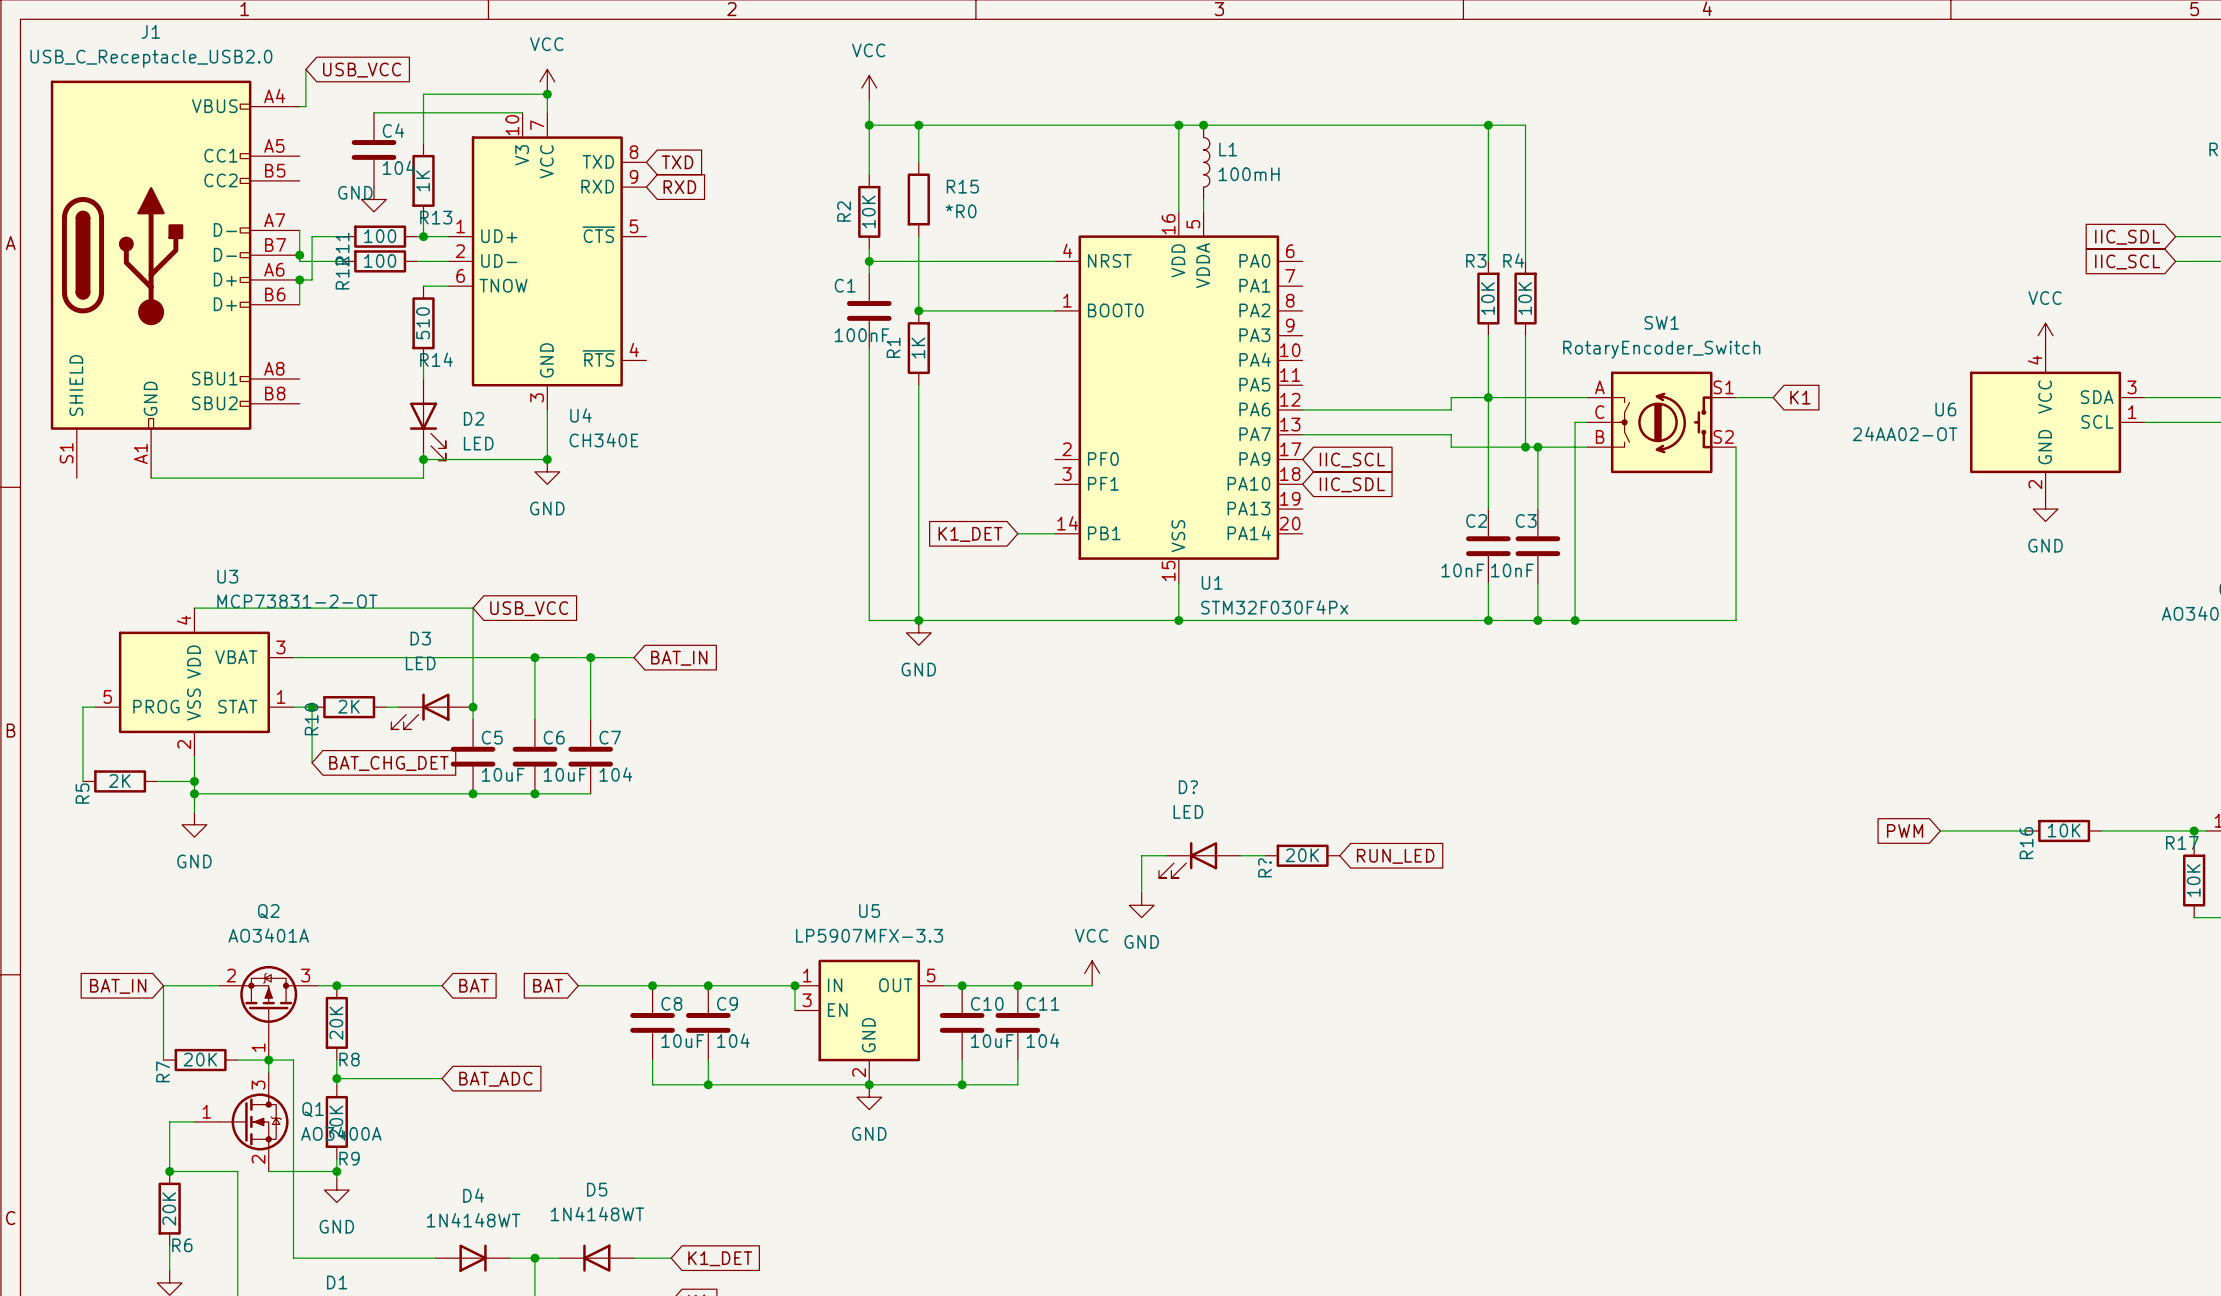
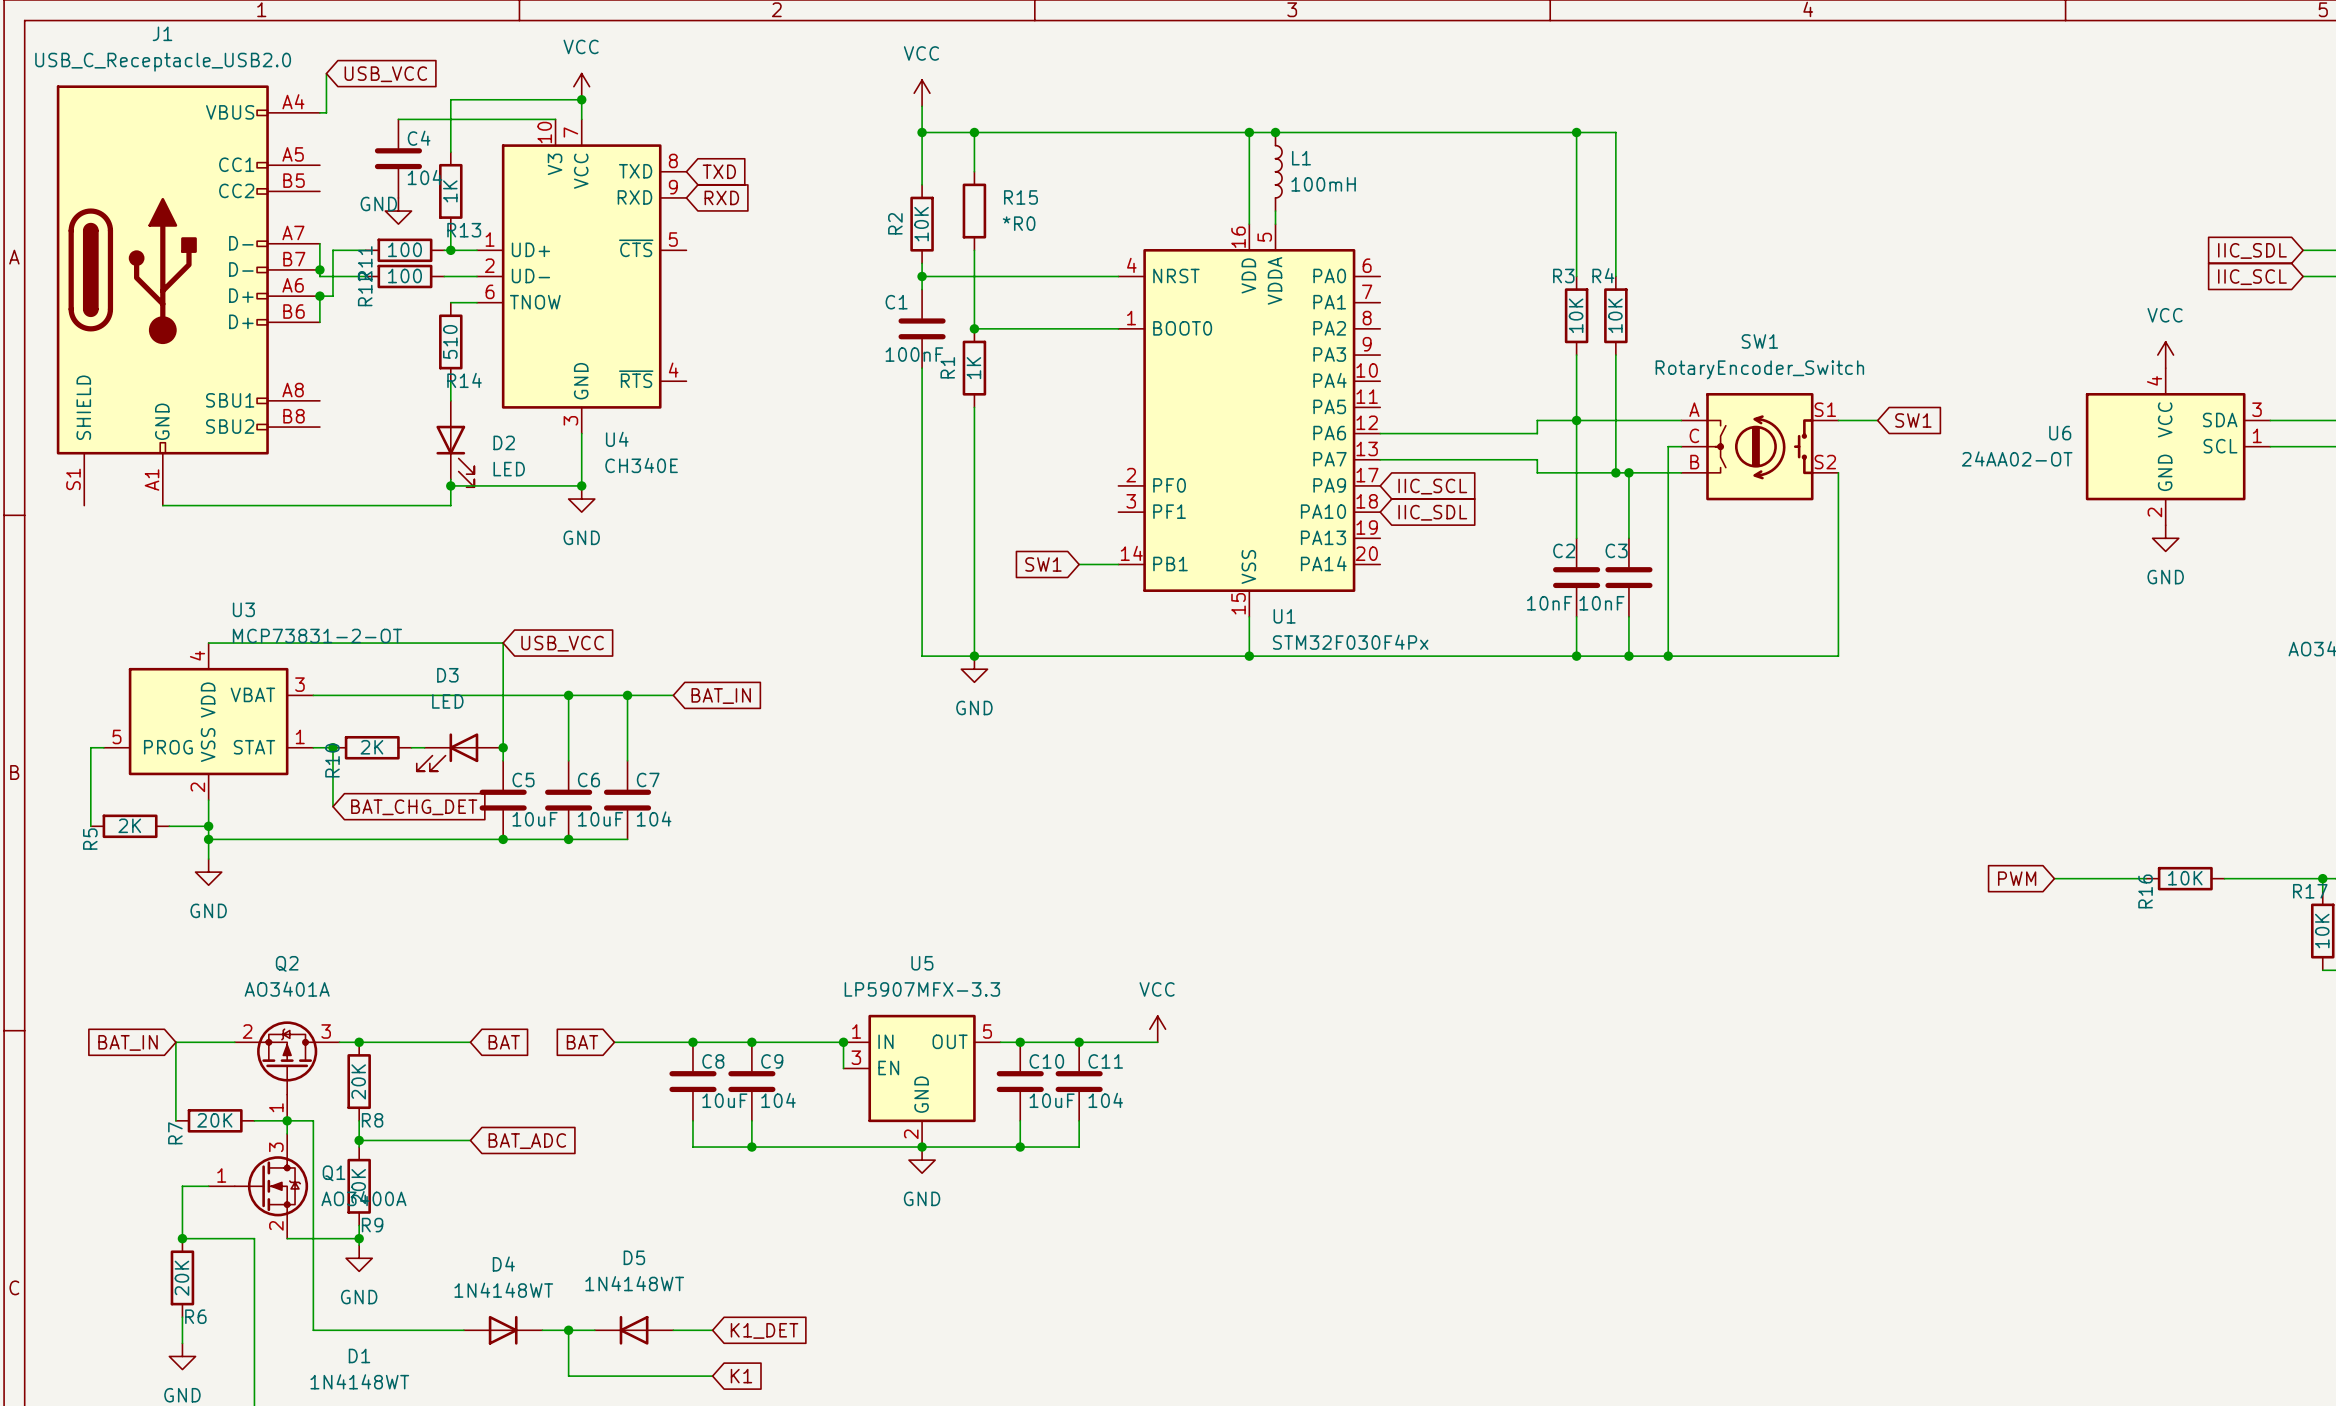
global label: K1 (1800, 397) -> SW1 (1913, 420)
global label: K1_DET (970, 534) -> SW1 (1043, 564)
wire: (1166, 855) (1141, 855) (1141, 892) -> none
wire: (1240, 855) (1265, 855) -> none
R?: 20K (1302, 855) -> none
global label: RUN_LED (1395, 856) -> none
D?: LED (1199, 860) -> none
power symbol: GND (1141, 905) -> none

